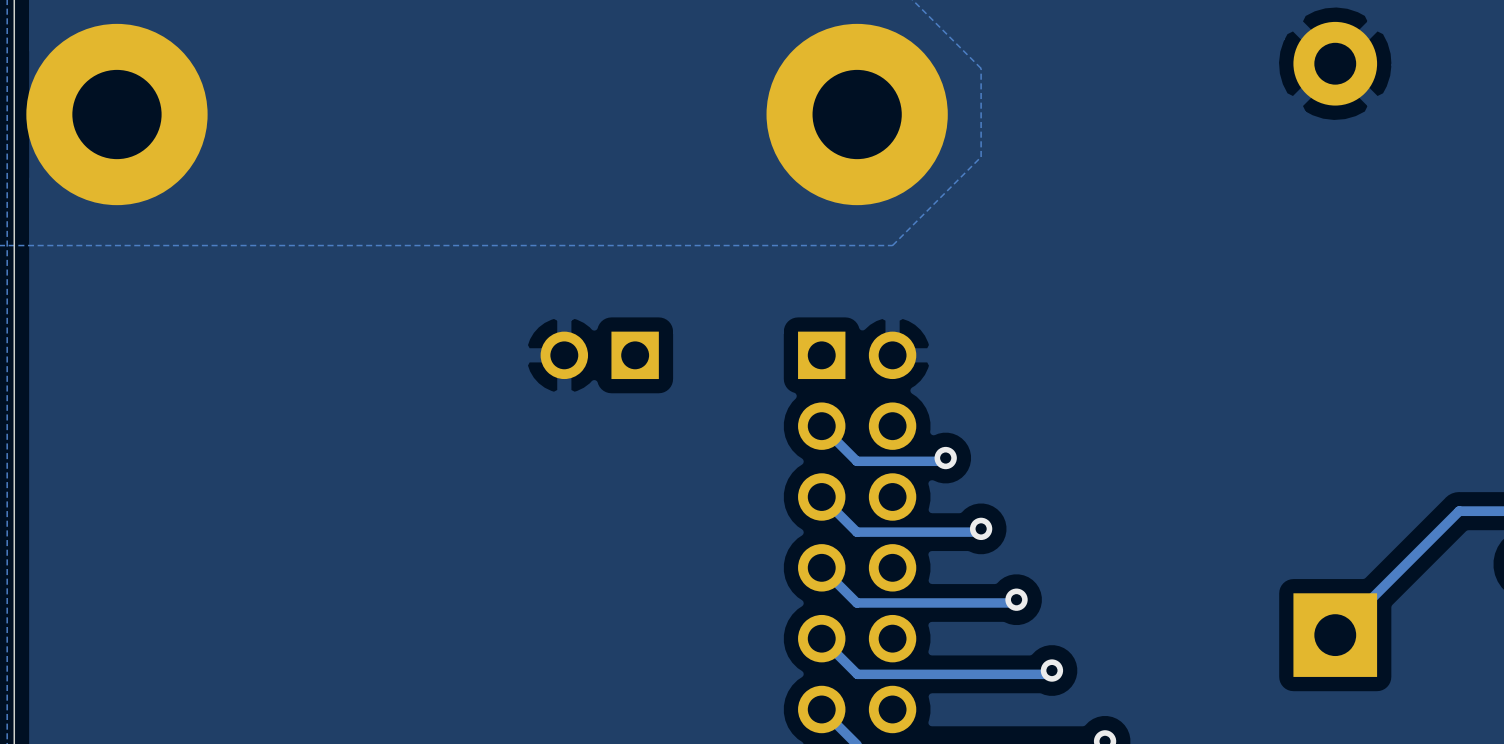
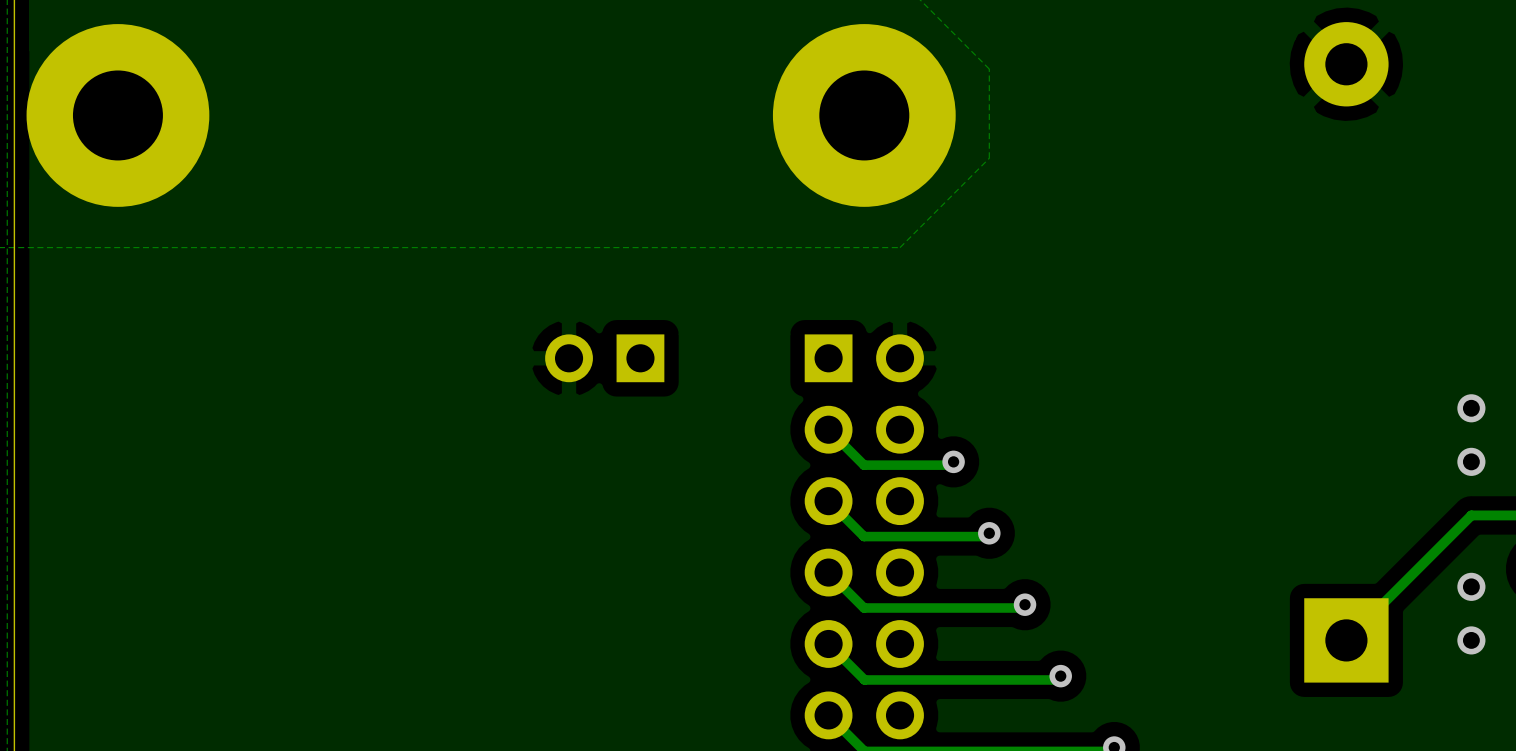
via: none -> (1471, 408)
via: none -> (1471, 461)
via: none -> (1471, 586)
via: none -> (1471, 640)

